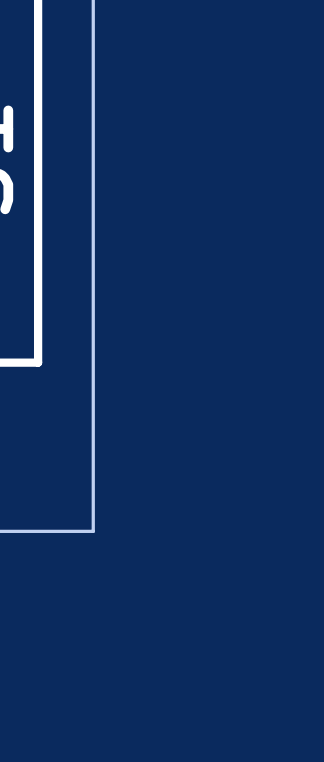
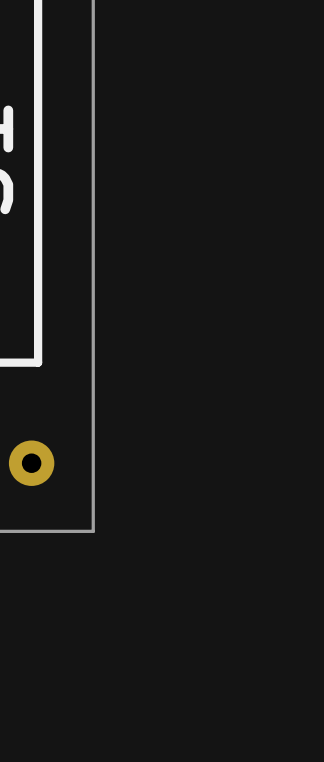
via: none -> (31, 463)

